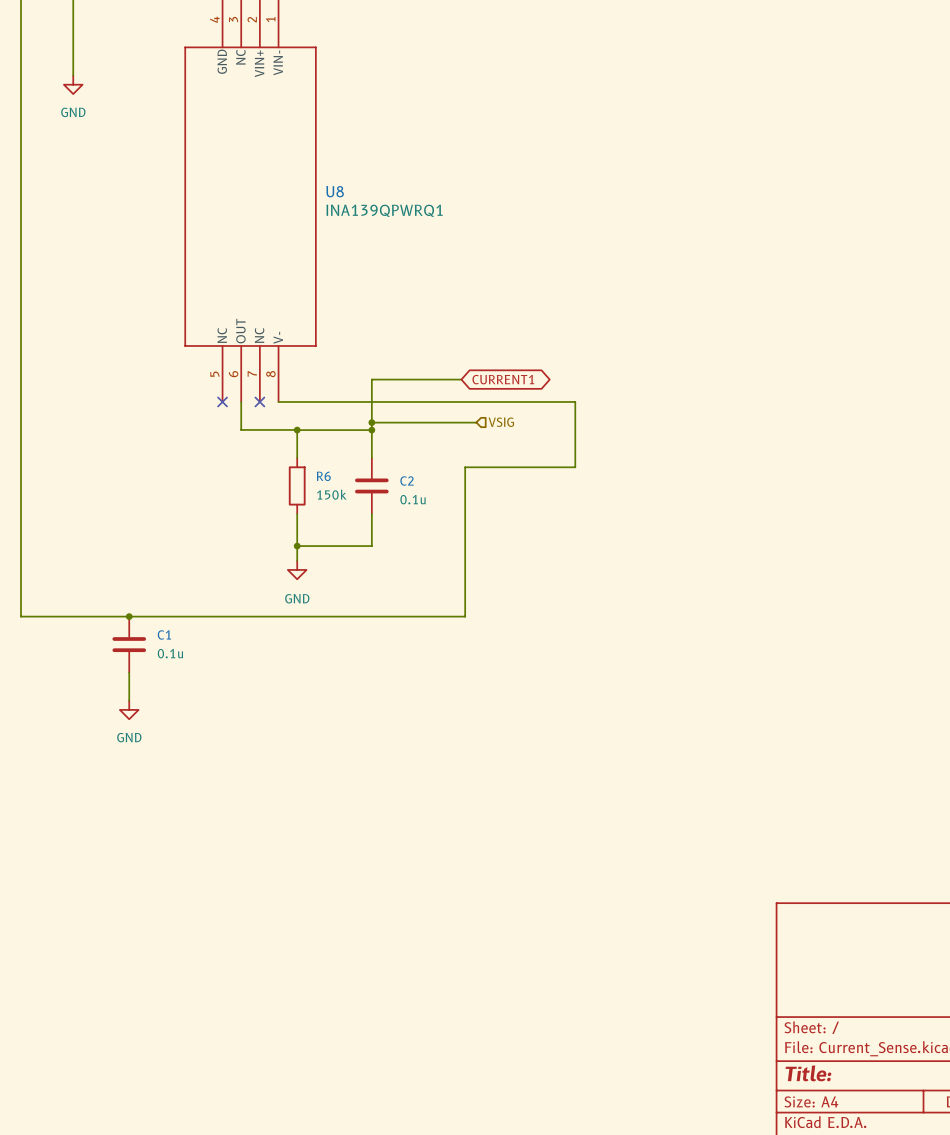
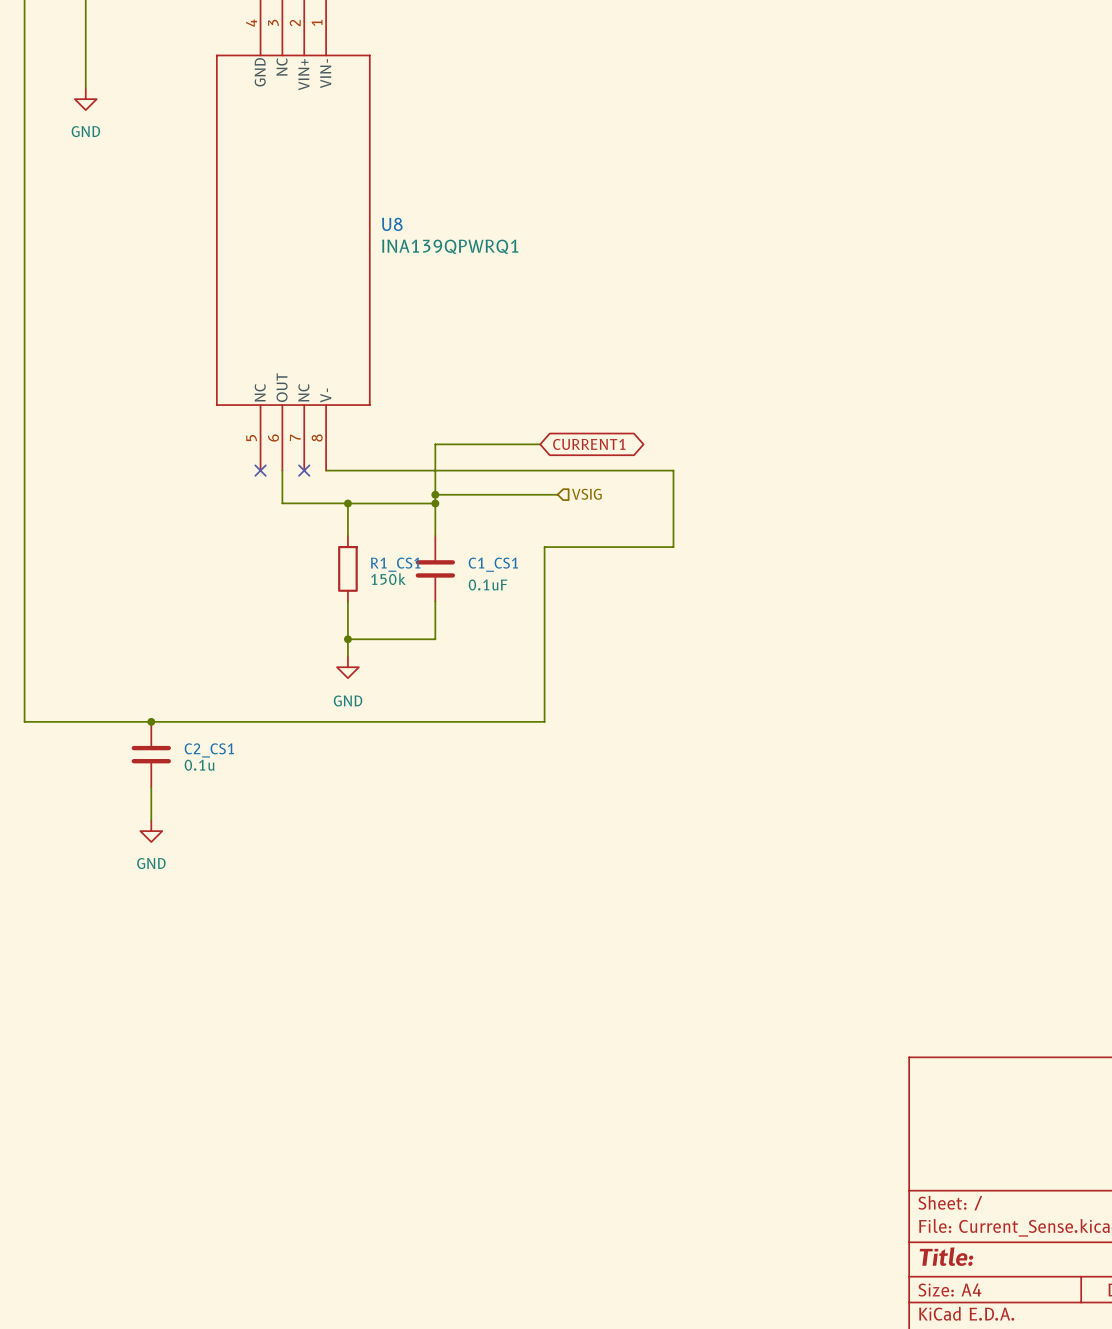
R6 name: R6 (323, 476) -> R1_CS1 (395, 564)
C2 name: C2 (407, 481) -> C1_CS1 (493, 564)
C2 value: 0.1u (413, 499) -> 0.1uF (488, 584)
C1 name: C1 (164, 634) -> C2_CS1 (209, 750)

